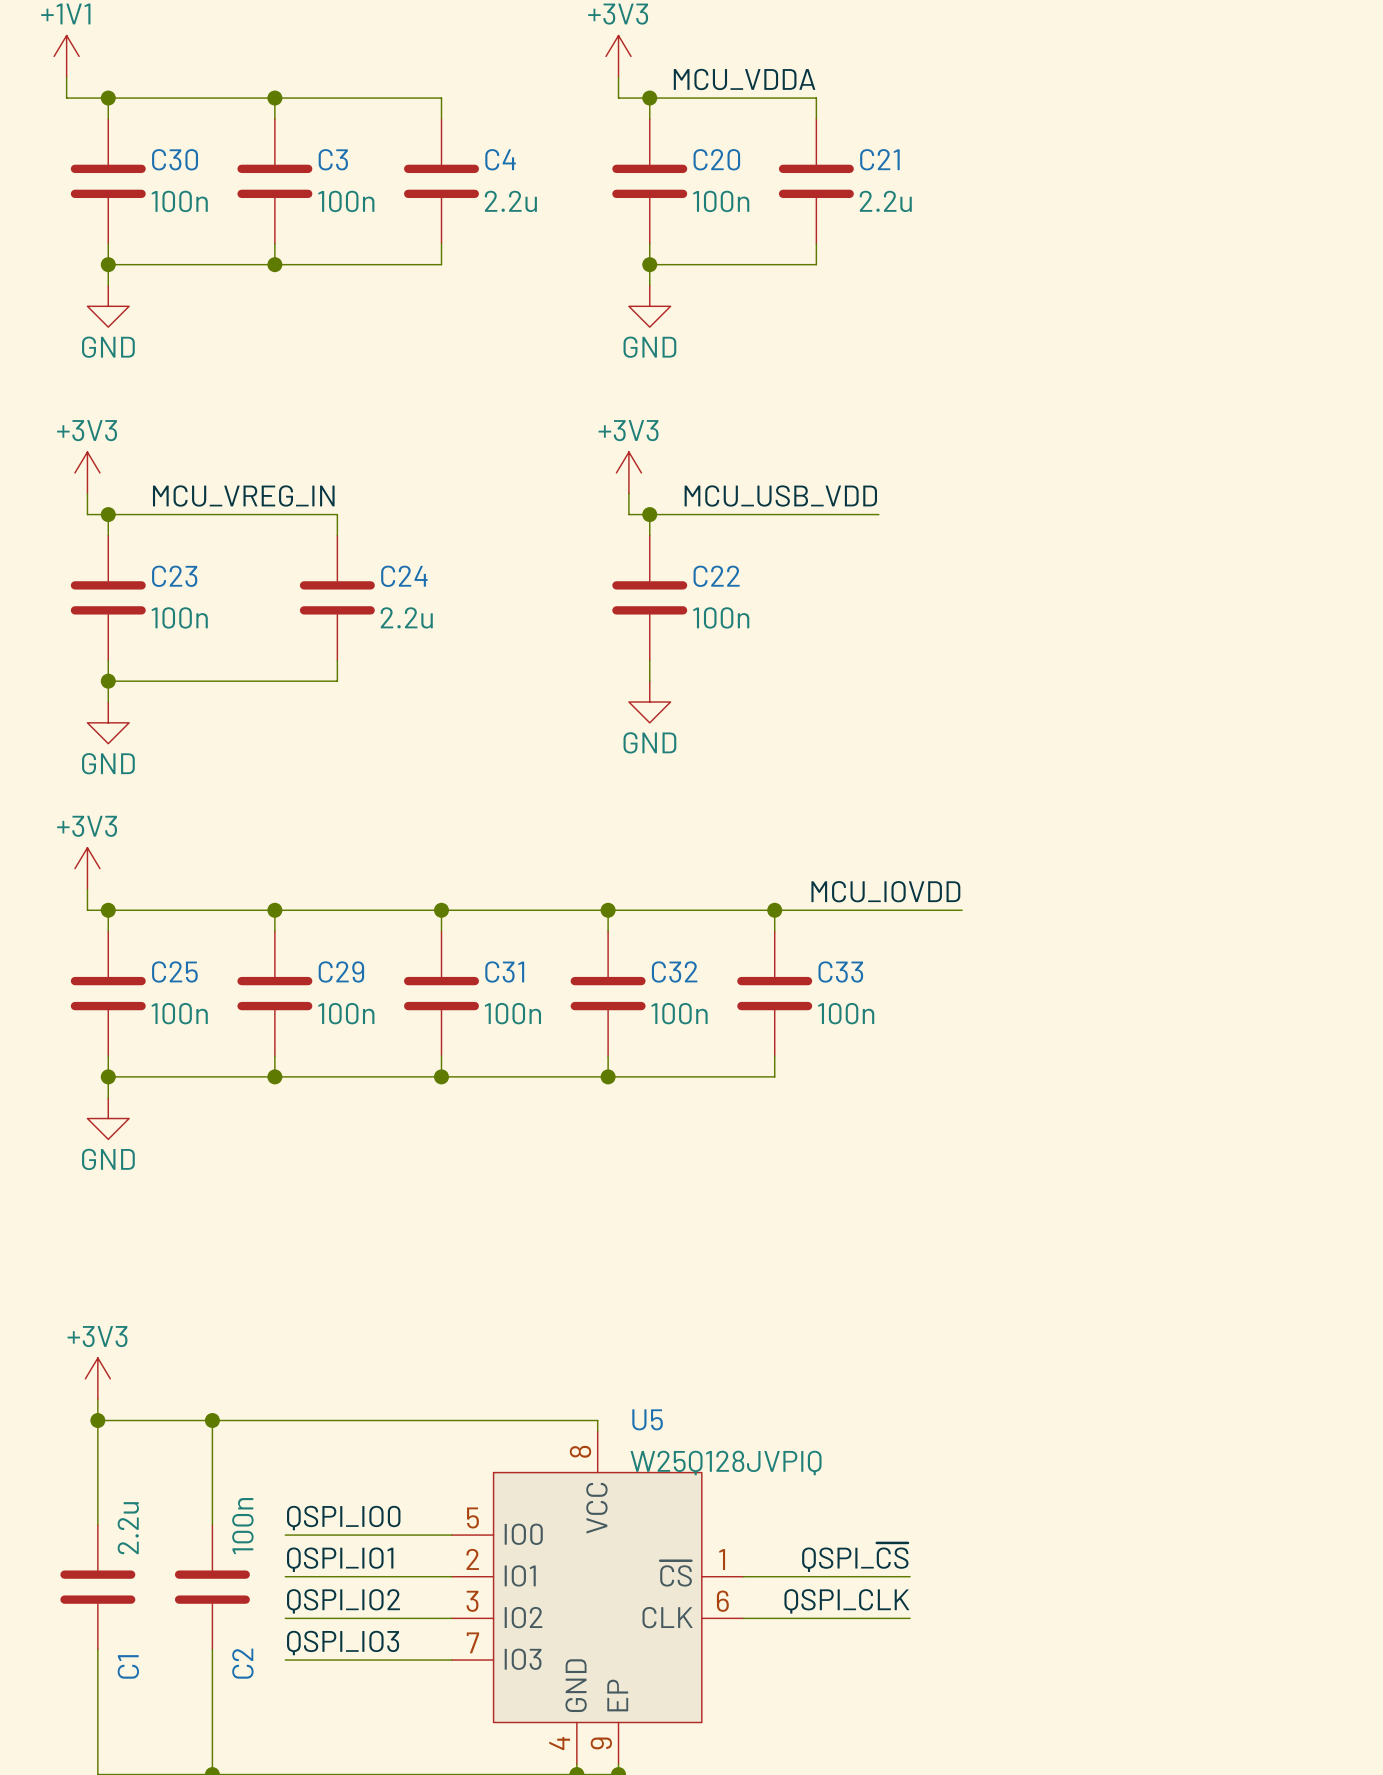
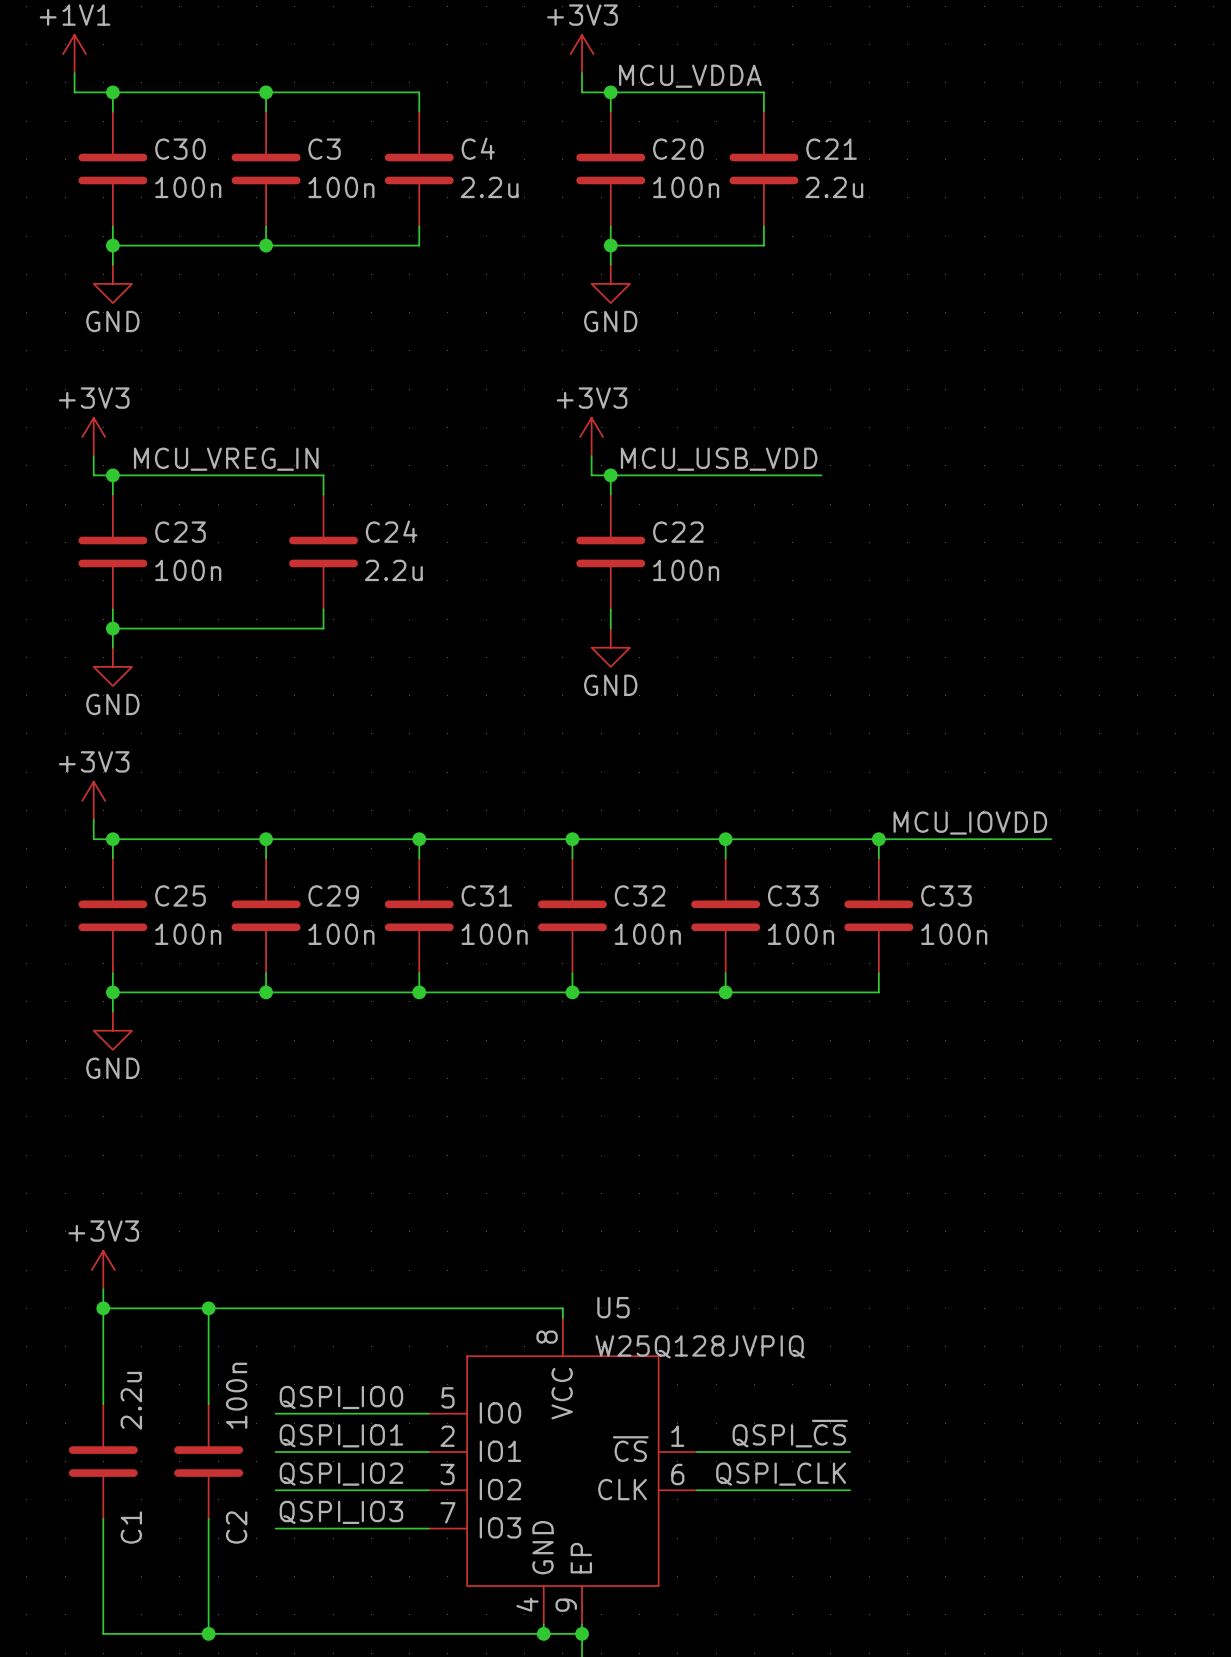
label position: MCU_IOVDD (885, 891) -> MCU_IOVDD (970, 823)
wire: none -> (878, 839) (878, 858)
junction: none -> (878, 839)
wire: none -> (897, 839) (1051, 839)
C33: none -> 100n (878, 915)
wire: none -> (878, 973) (878, 992) (725, 992)
junction: none -> (725, 992)

